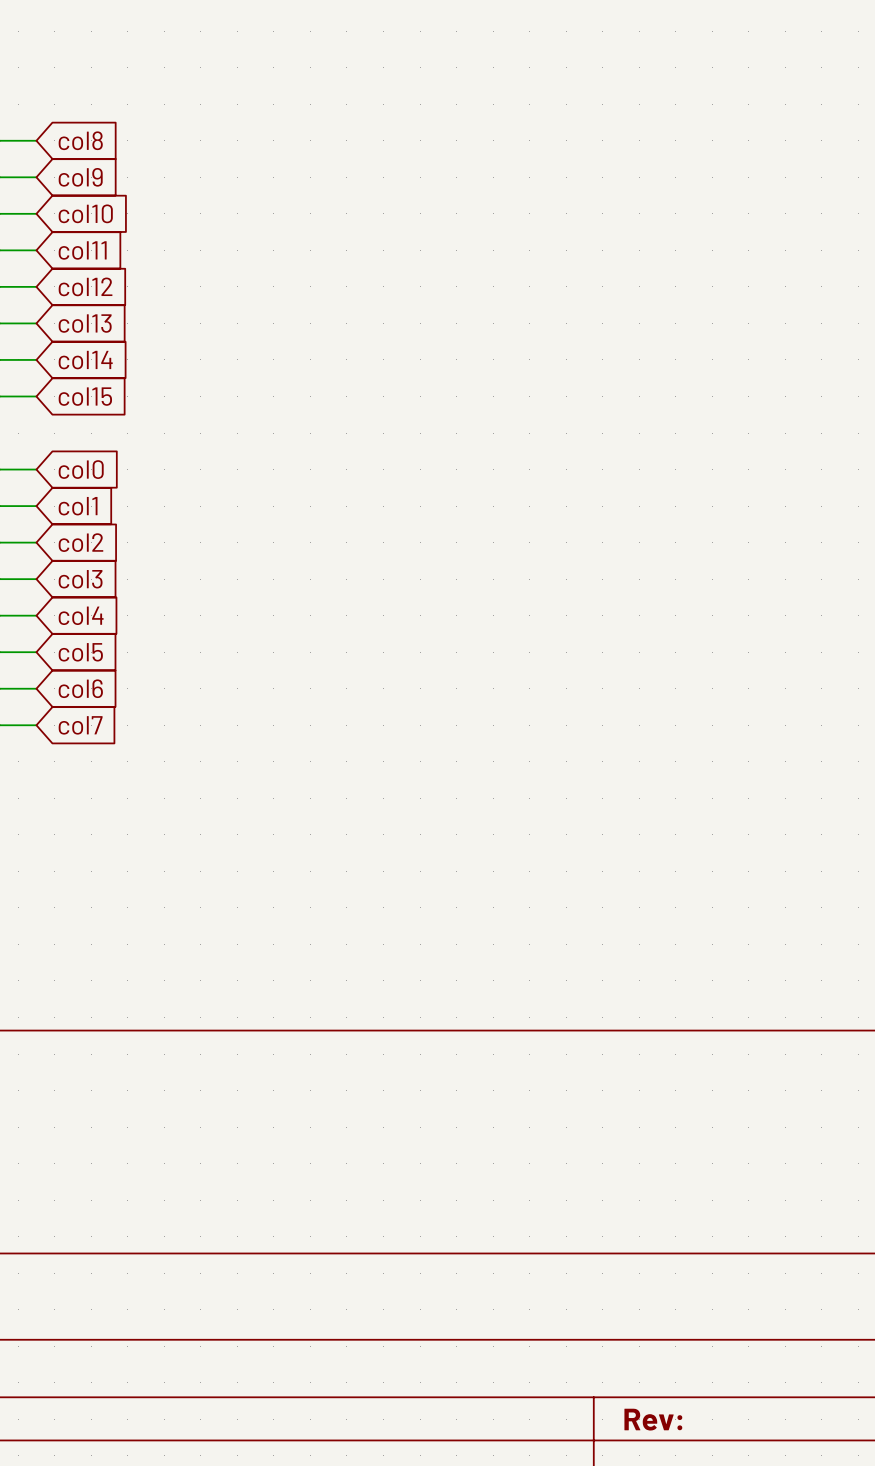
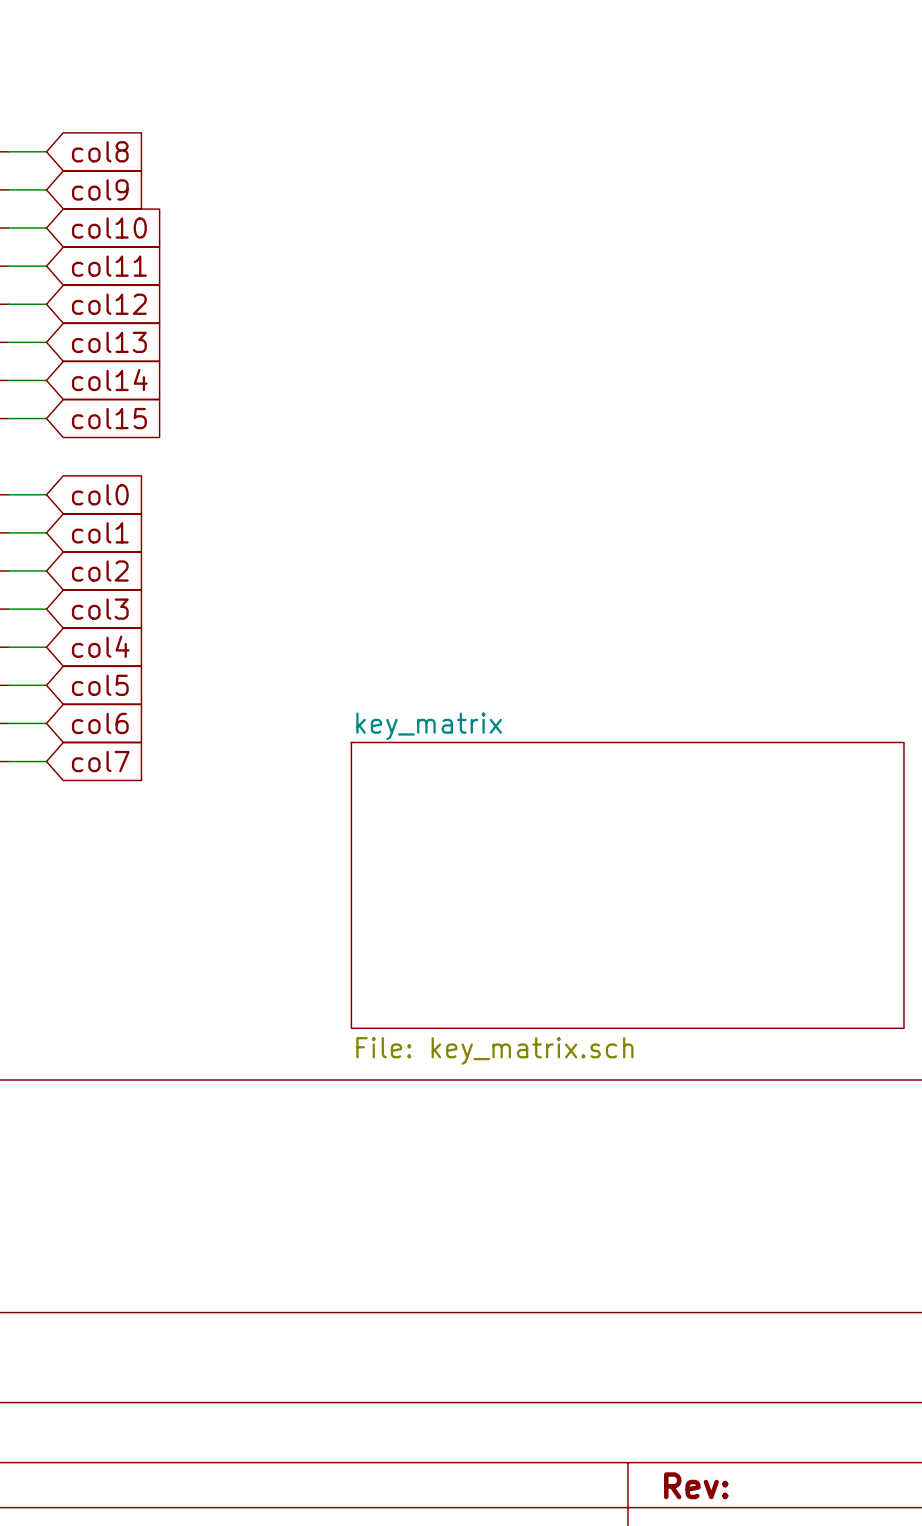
sheet key_matrix: none -> File: key_matrix.sch (627, 885)

